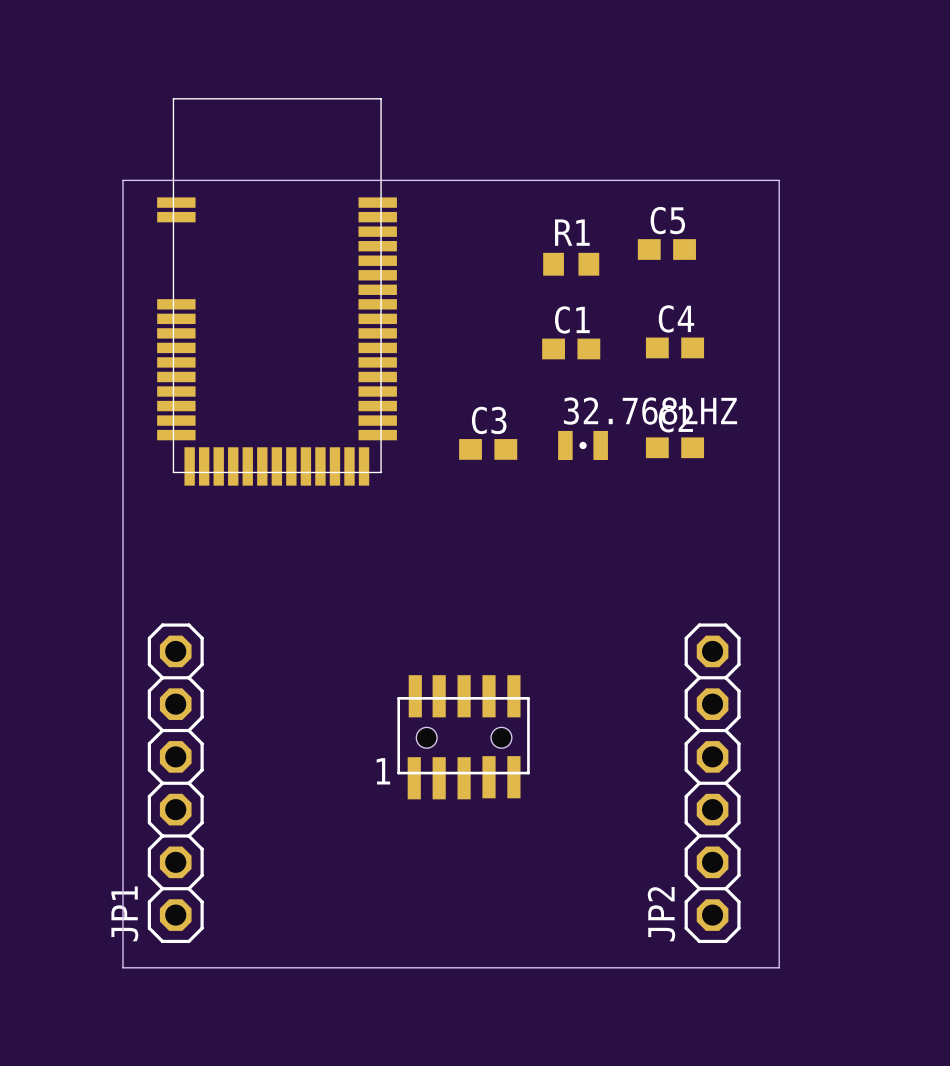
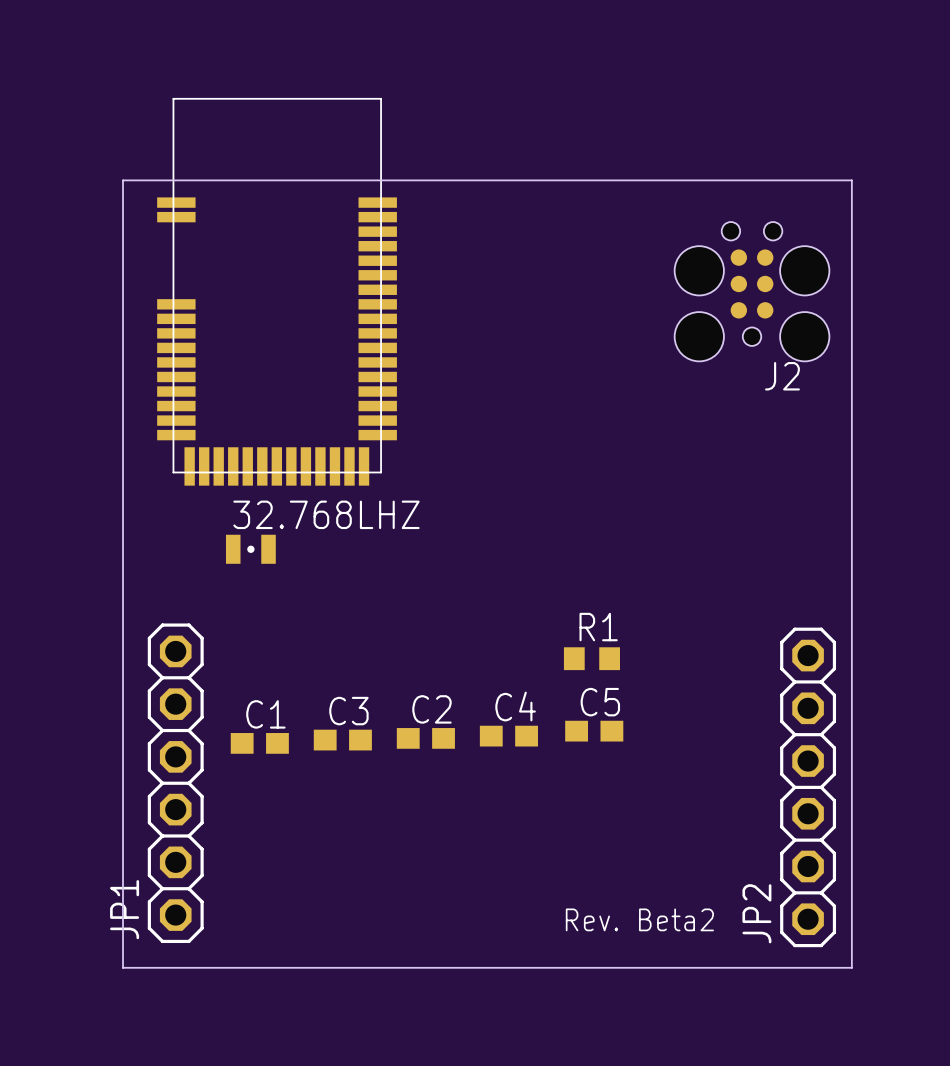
board edge: (779, 180) (779, 967) -> (779, 180) (851, 180) (851, 967) (779, 967)
C5 position: (666, 249) -> (594, 731)
R1 position: (571, 264) -> (591, 658)
J2: none -> (752, 291)
C4 position: (675, 347) -> (508, 736)
C1 position: (571, 348) -> (259, 743)
32.768LHZ position: (583, 445) -> (250, 549)
C2 position: (675, 447) -> (425, 738)
C3 position: (488, 449) -> (342, 740)
part: (463, 737) -> none
JP2 position: (712, 783) -> (808, 787)
text: none -> Rev. Beta2 (639, 919)

